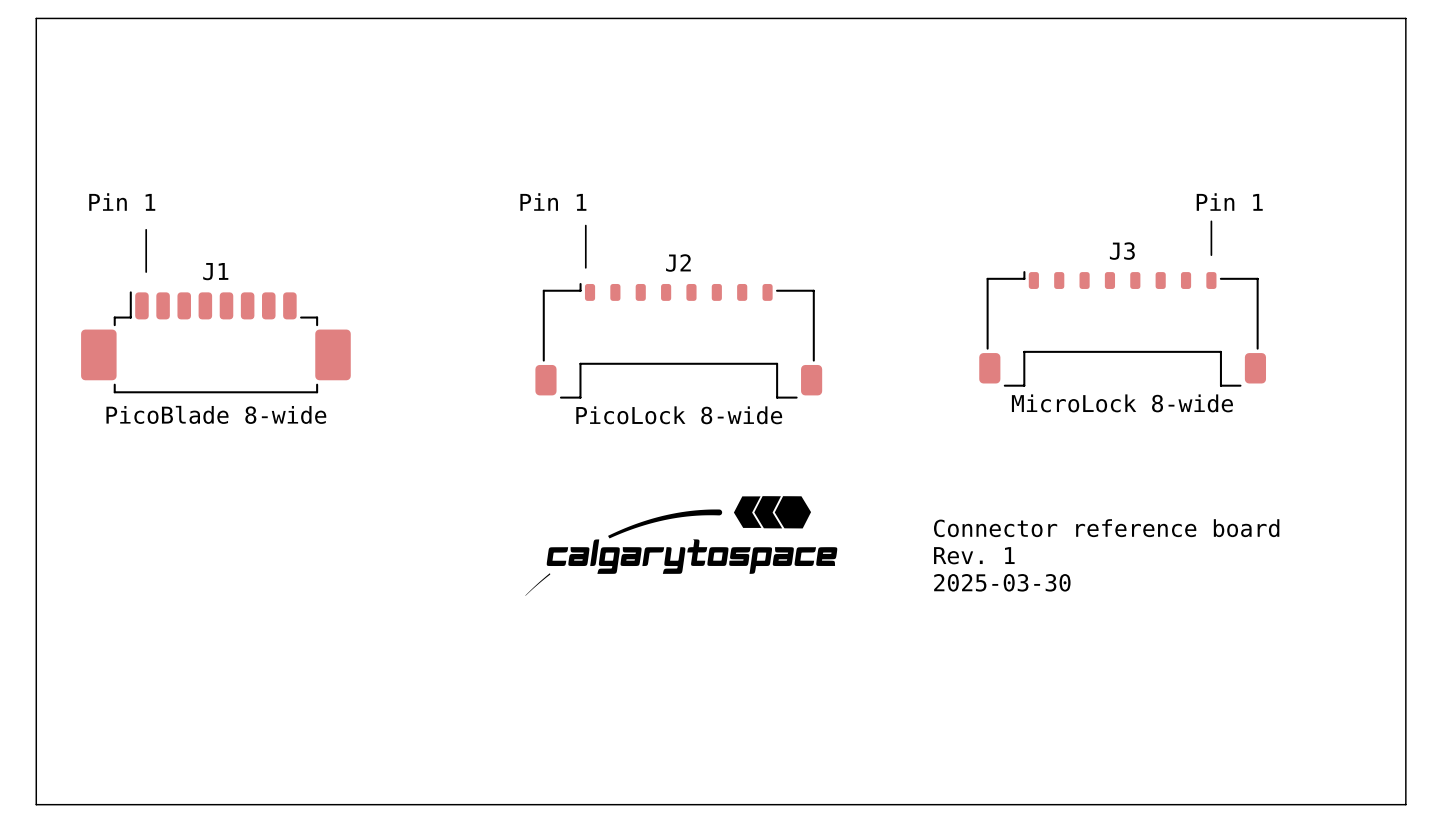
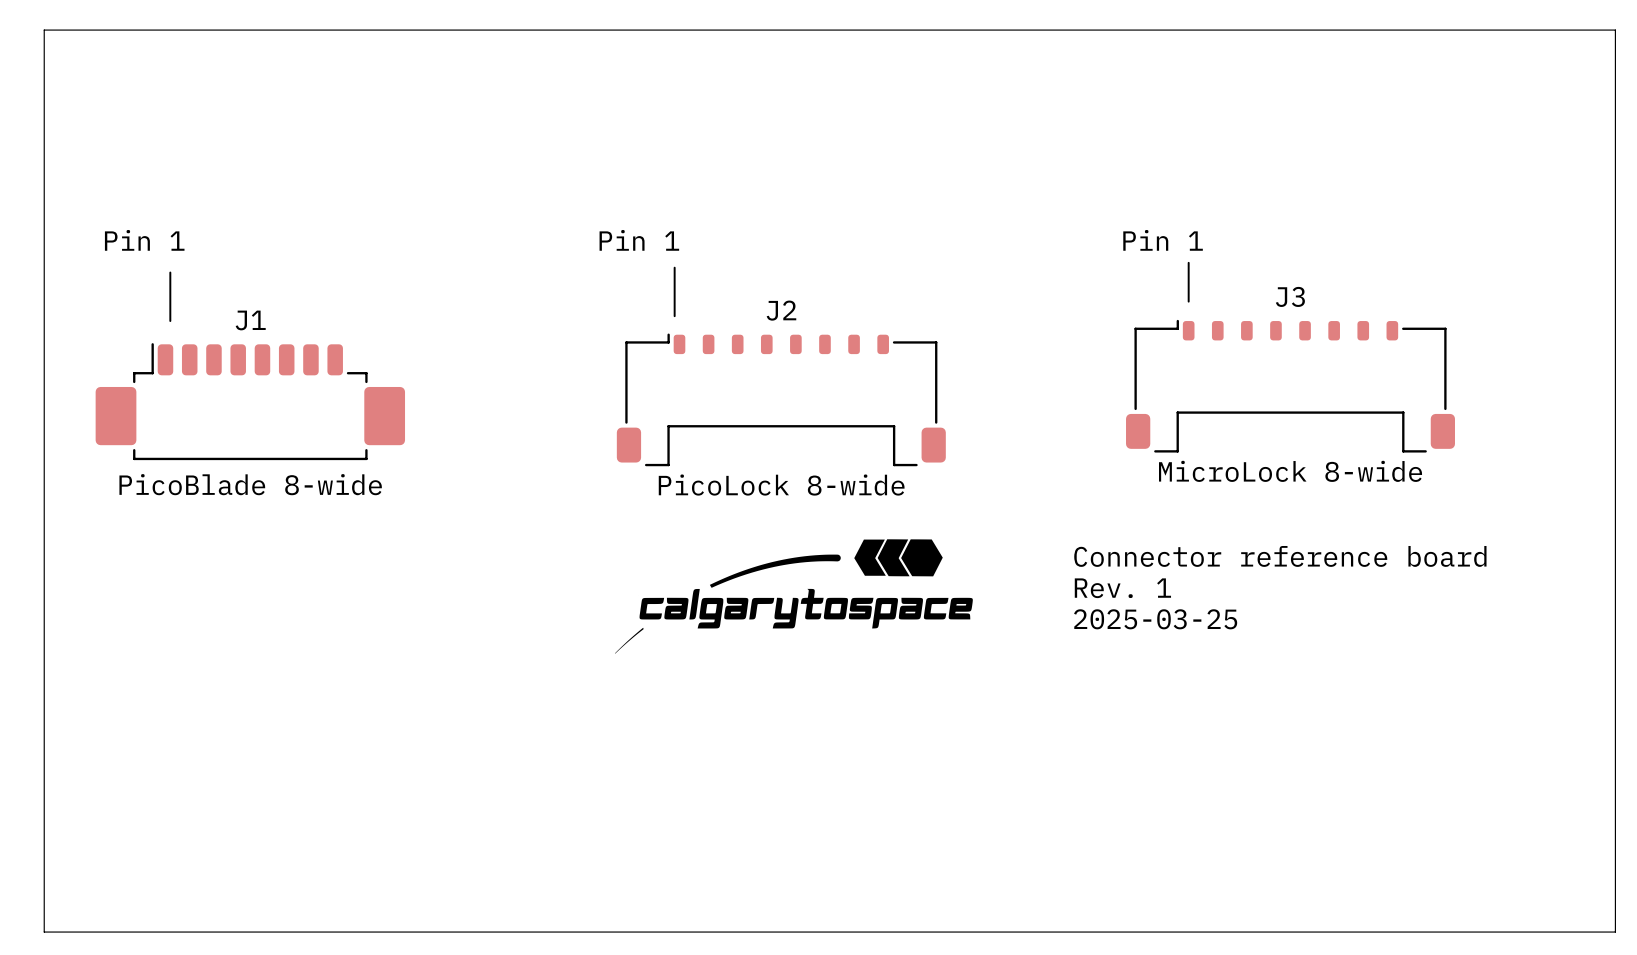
text position: Pin 1 (1229, 202) -> Pin 1 (1163, 240)
line: (1211, 221) (1211, 255) -> (1188, 262) (1188, 301)
text position: Connector reference board (1106, 528) -> Connector reference board (1280, 556)
text: none -> 2025-03-25 (1155, 619)
drawing position: (681, 545) -> (793, 596)
text position: Rev. 1 (974, 555) -> Rev. 1 (1122, 588)
text: 2025-03-30 (1002, 582) -> none

